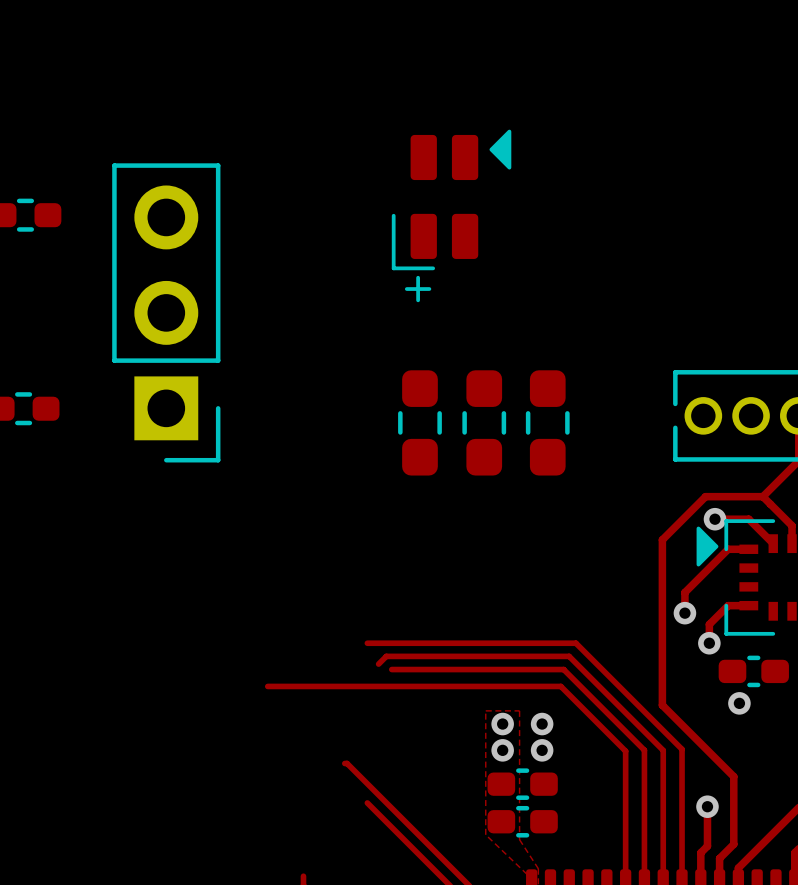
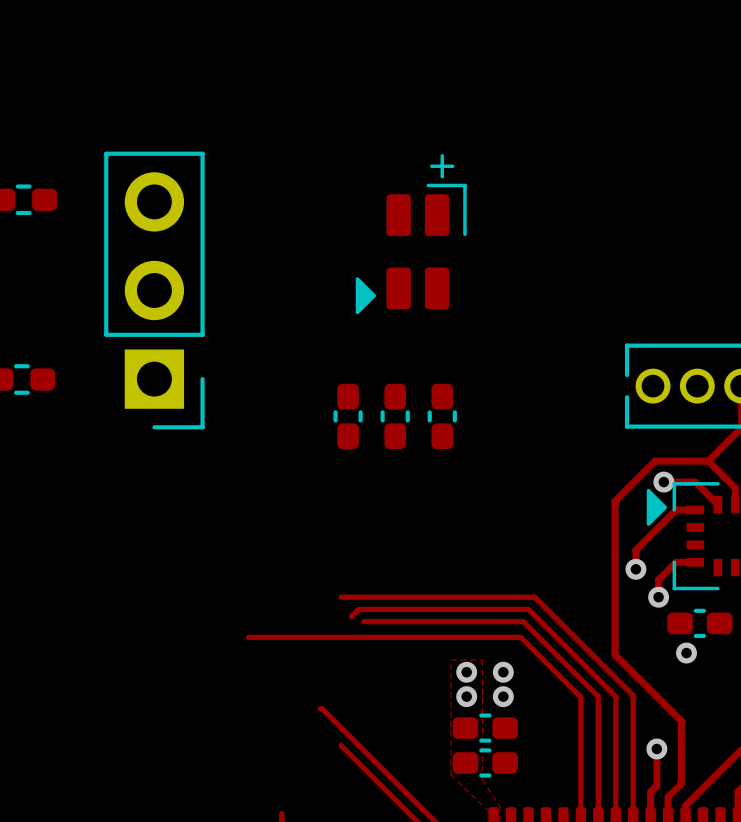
part rotation: 0° (451, 215) -> 180° (411, 234)
part footprint: [462, 370, 507, 476] -> [427, 383, 457, 450]
part: (419, 422) -> none
part: (547, 422) -> none
part: none -> (348, 416)
part: none -> (395, 416)

